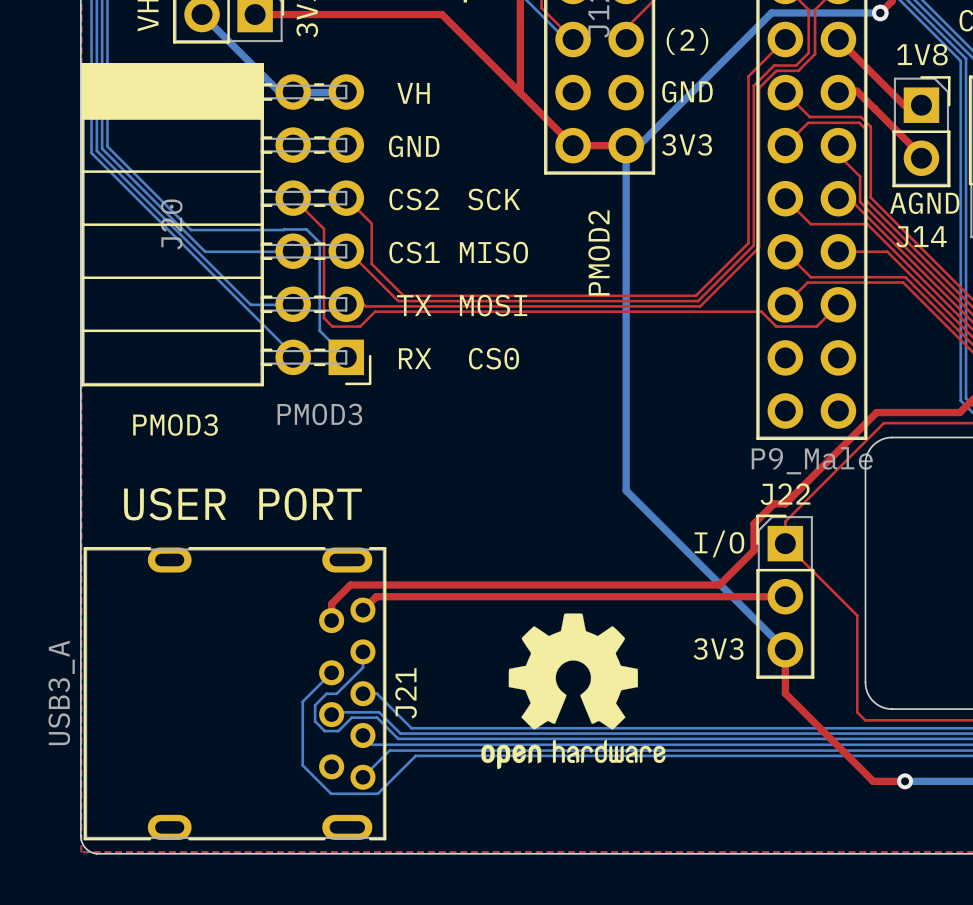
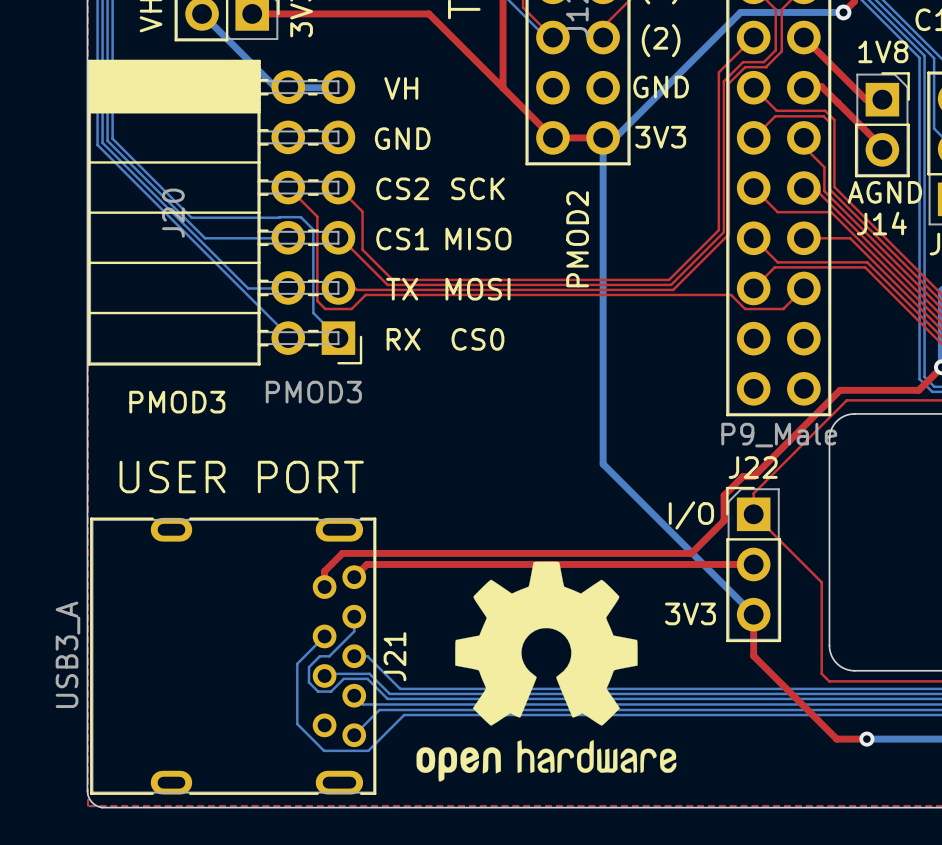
drawing shape: [481, 613, 666, 770] -> [416, 561, 677, 782]

